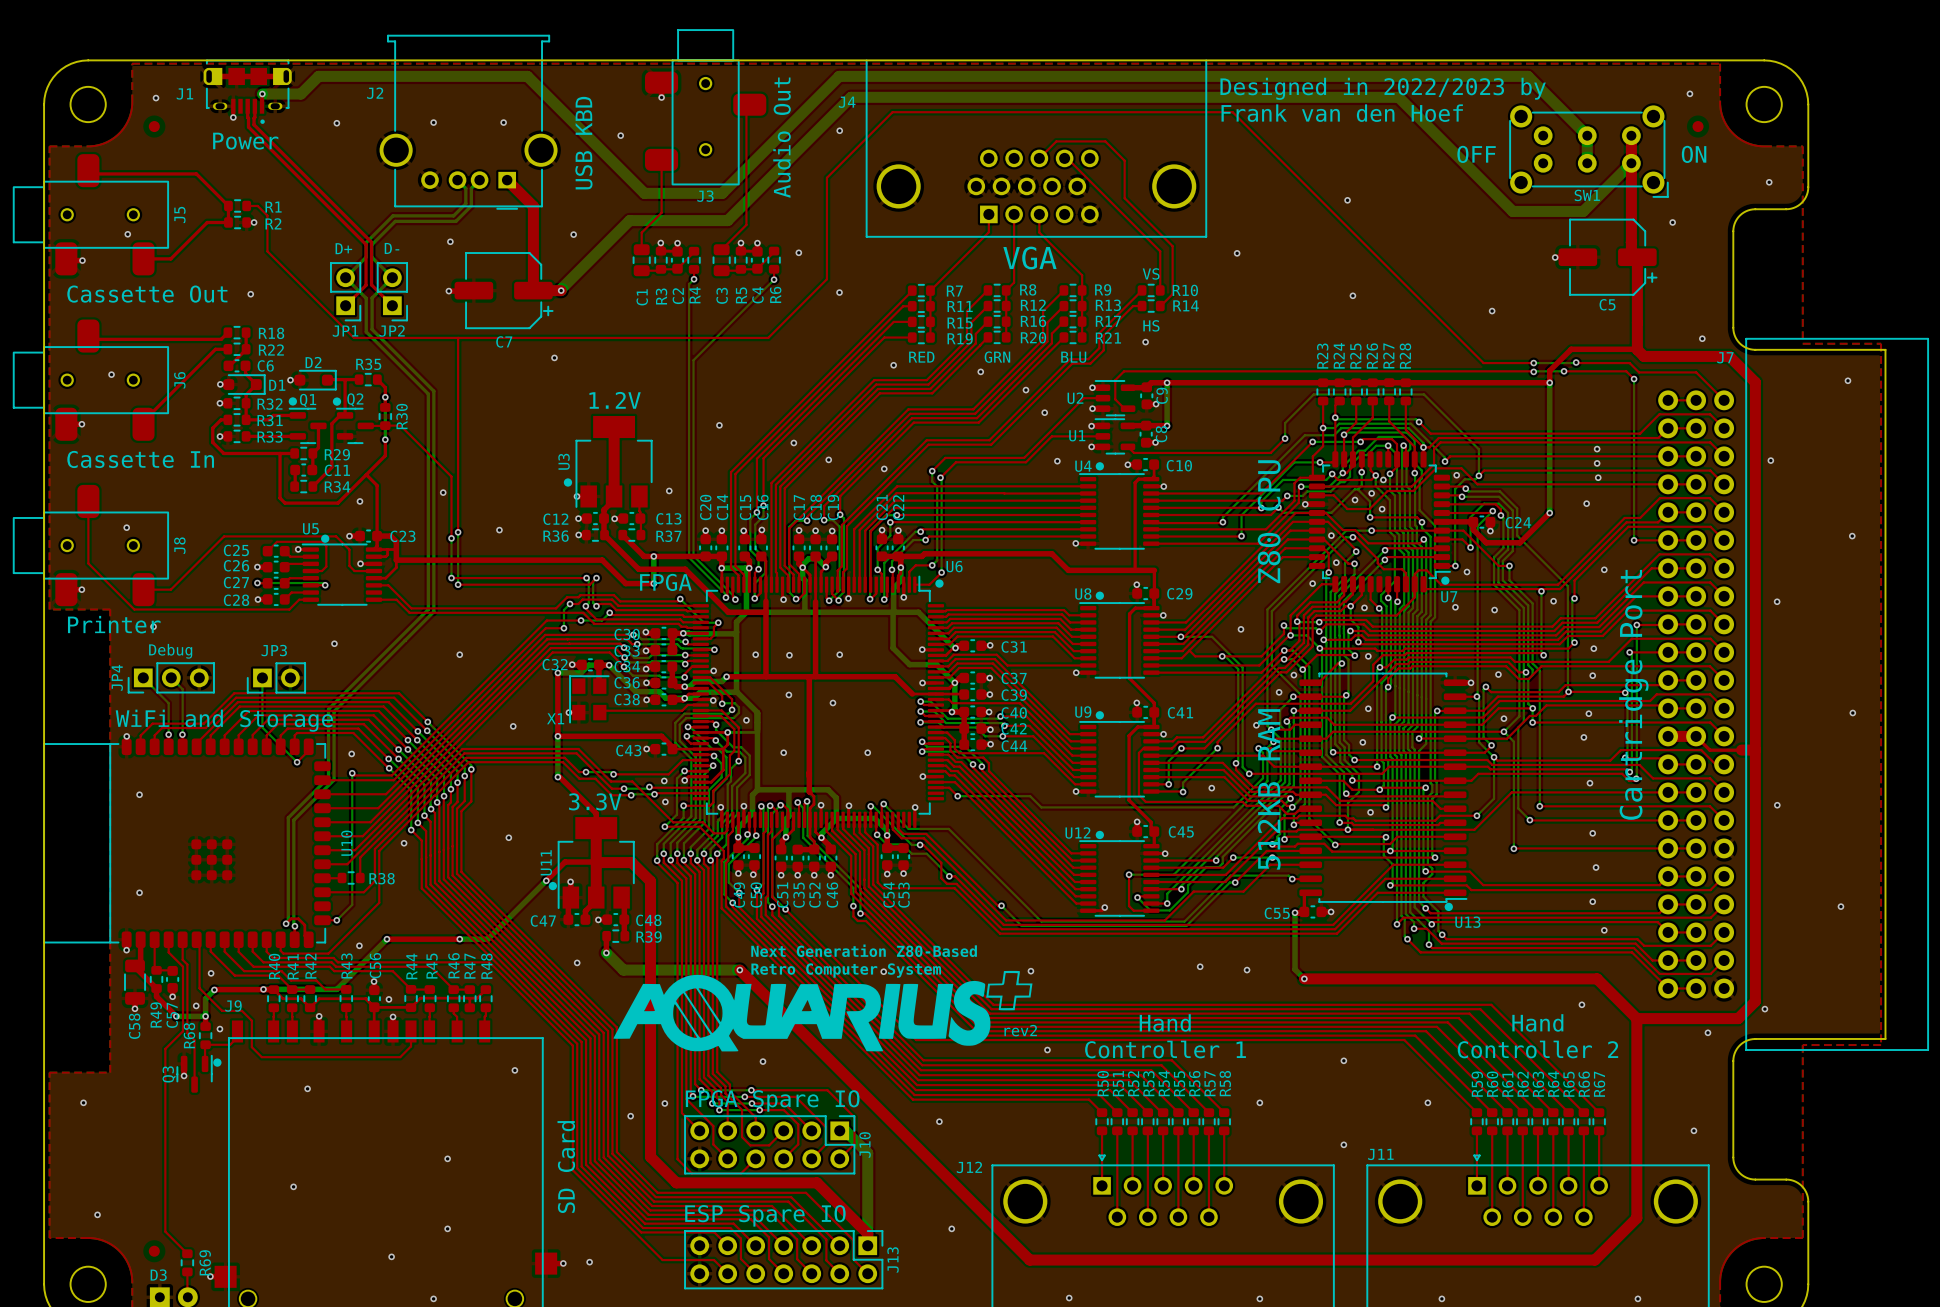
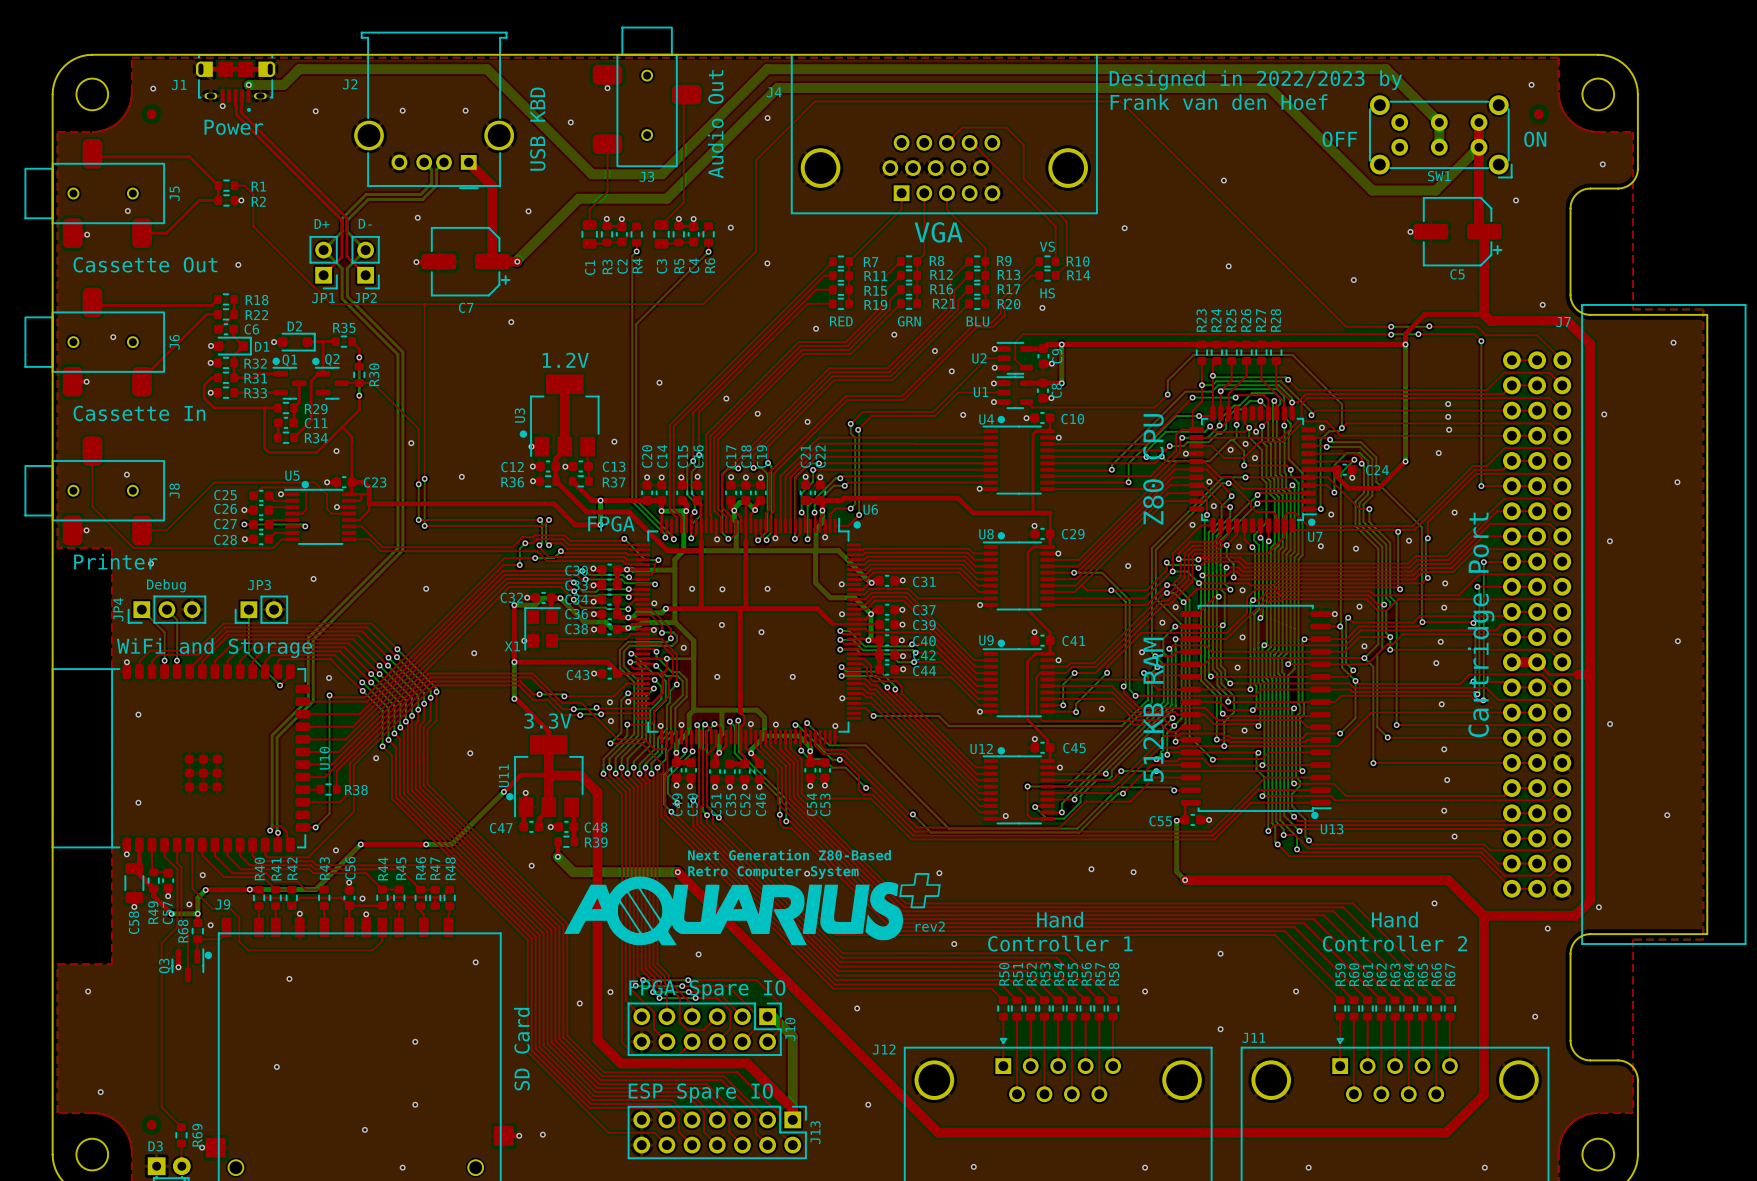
R20 name position: R20 (1033, 337) -> R20 (1009, 304)
R21 name position: R21 (1108, 337) -> R21 (944, 303)

